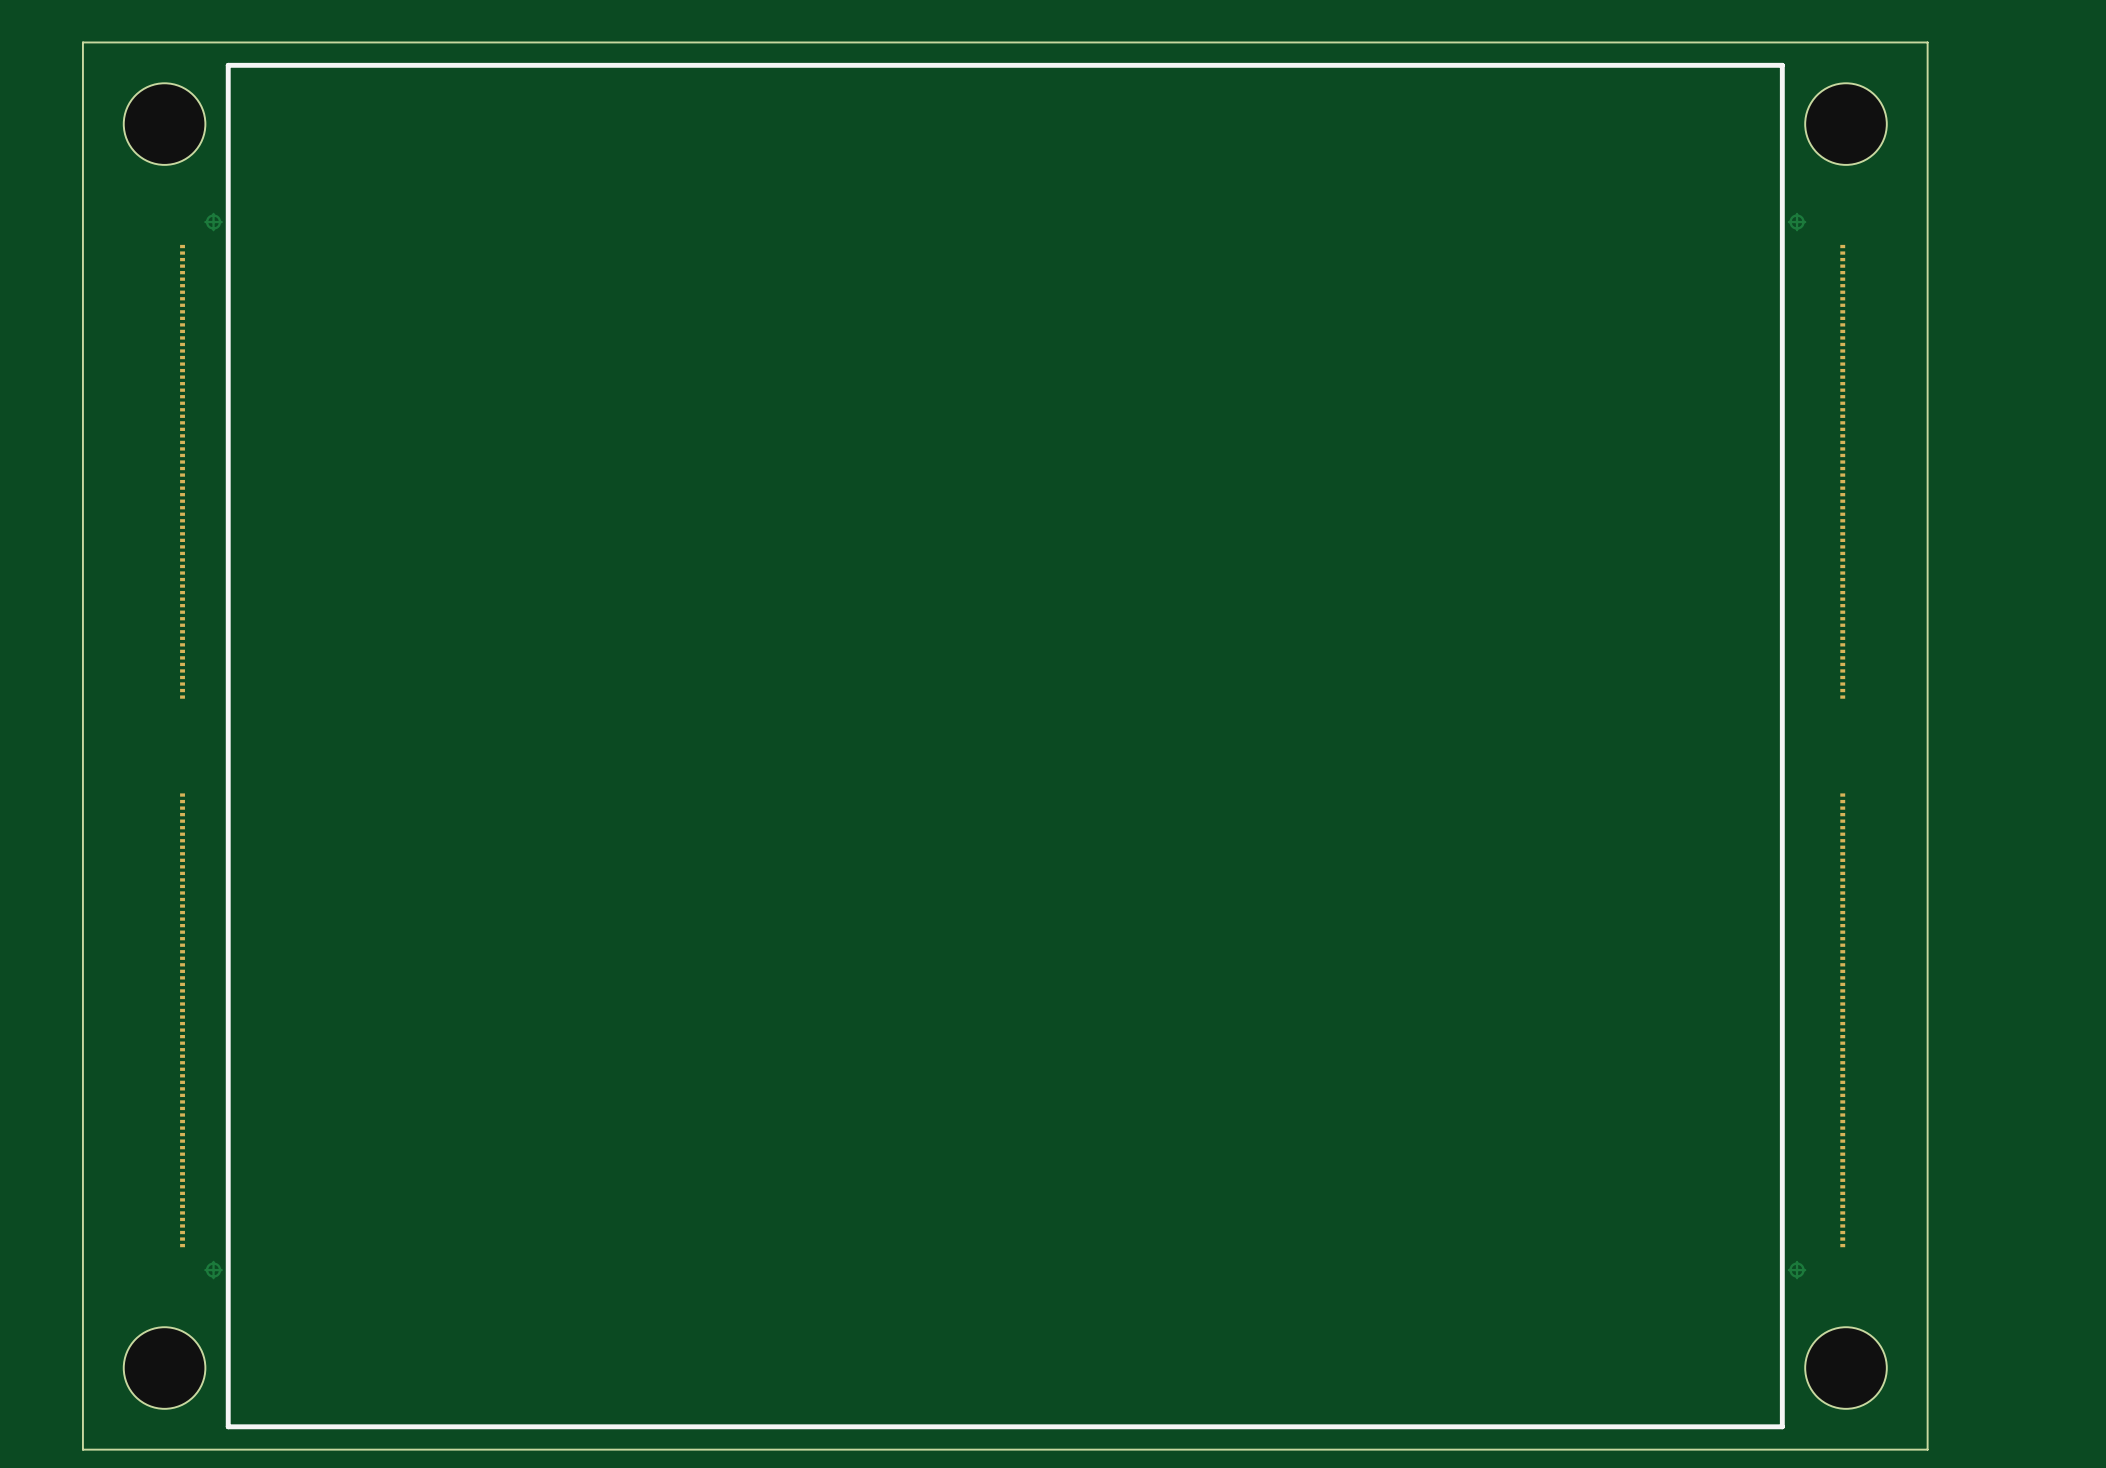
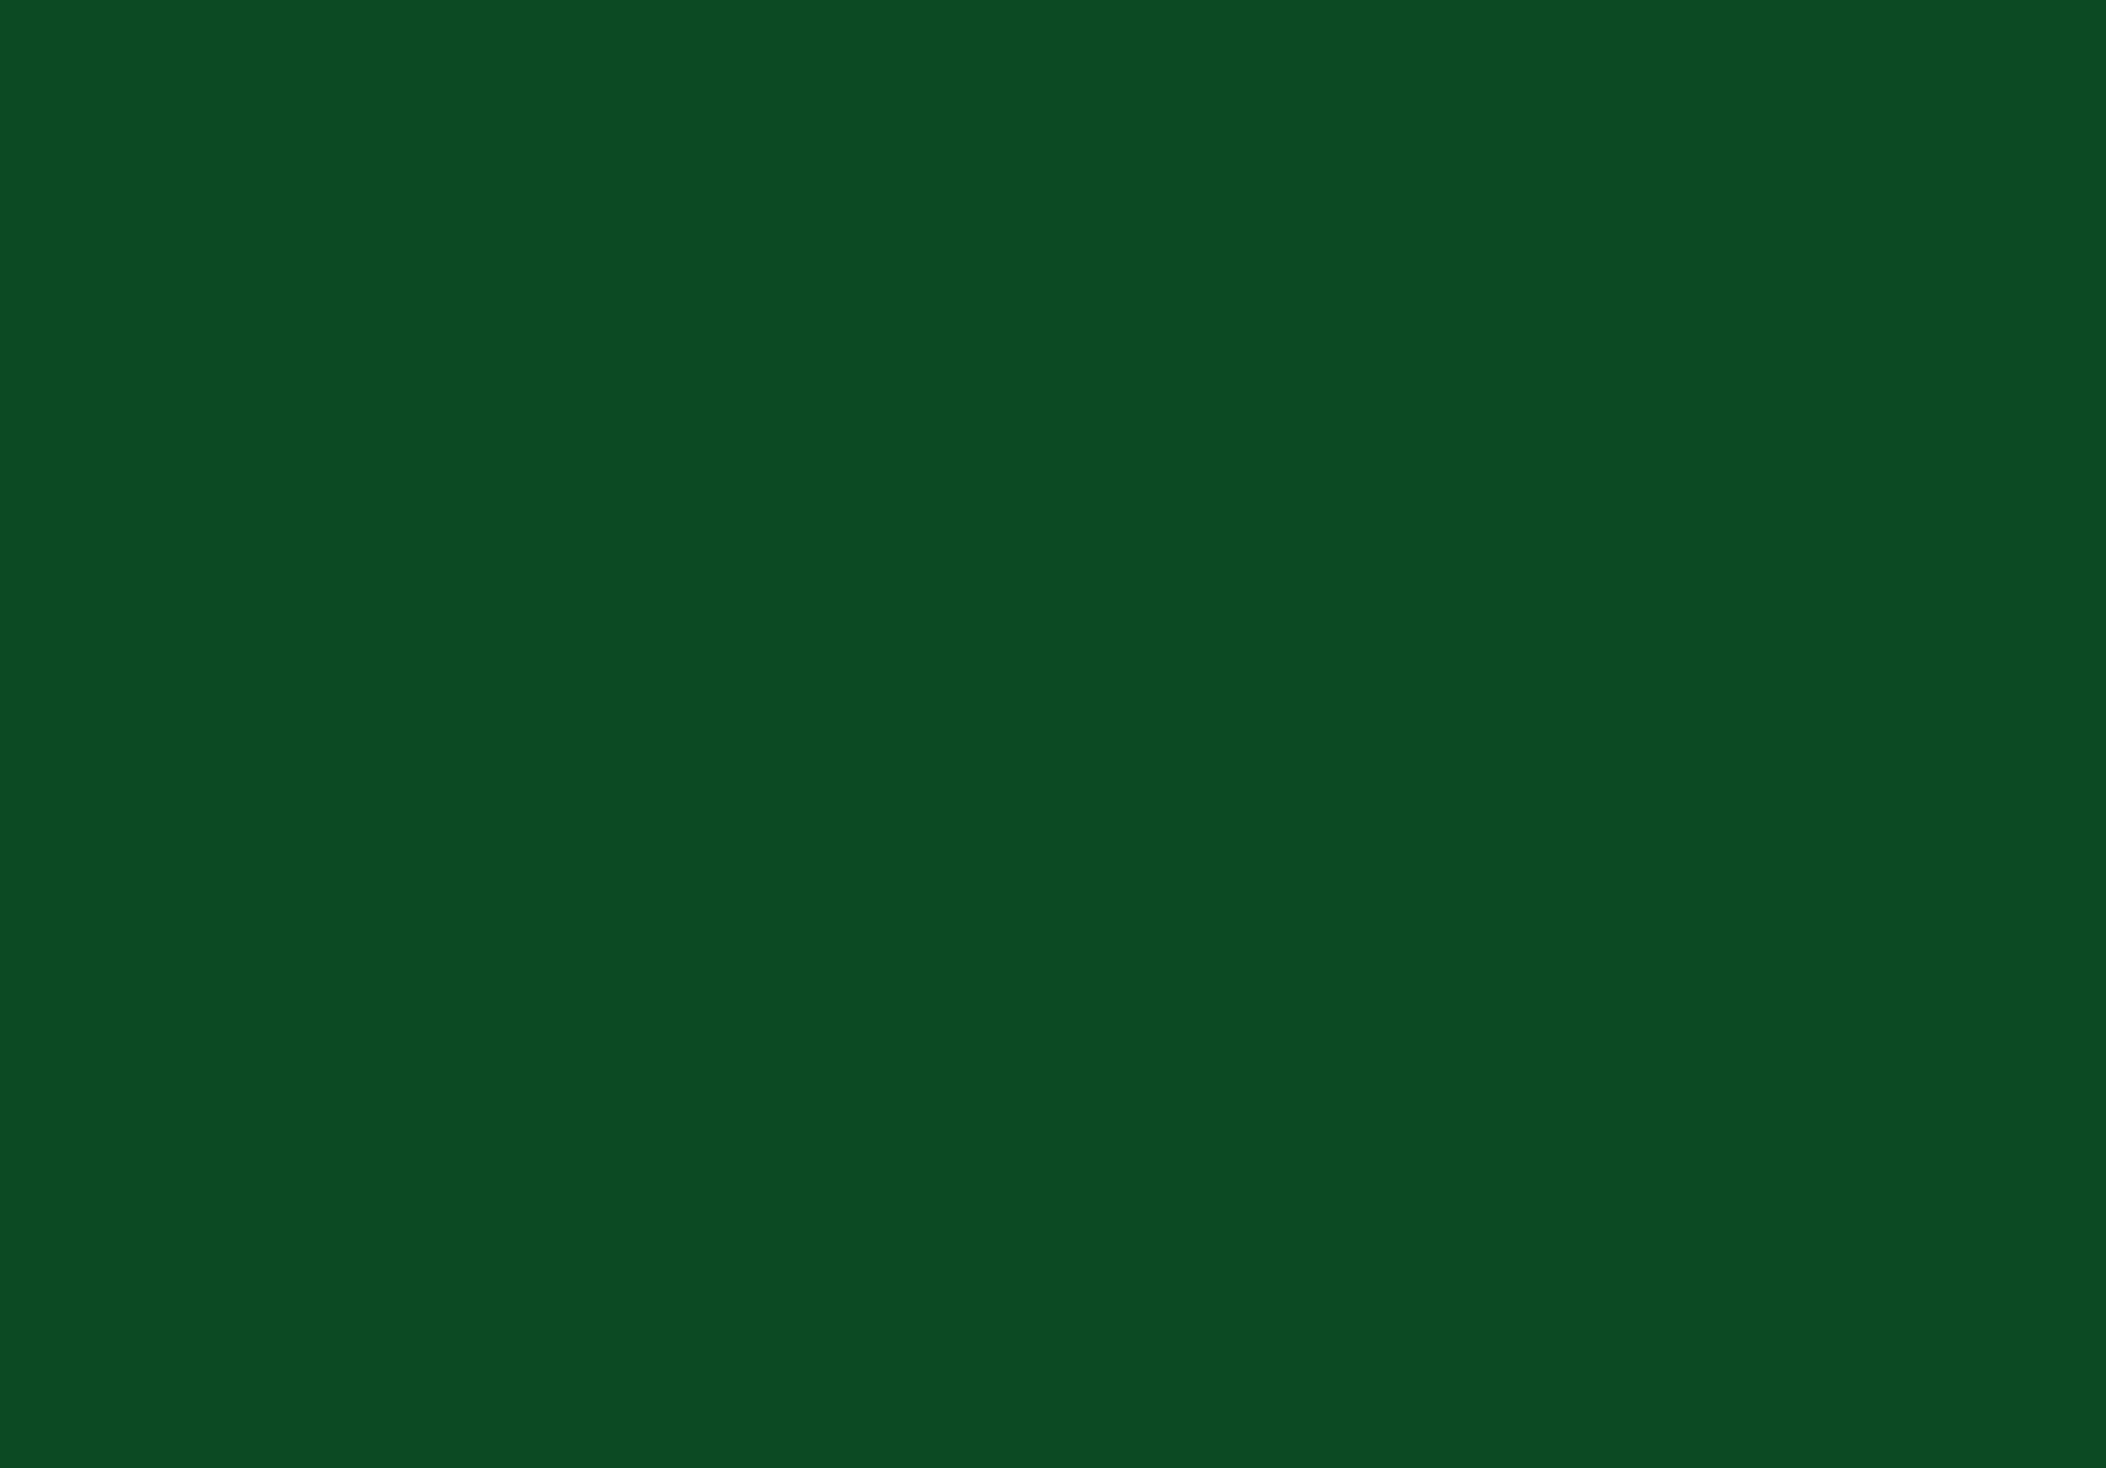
board edge: (82, 42) (1927, 42) (1927, 1449) (82, 1449) (82, 42) -> none
line: (228, 65) (1782, 65) (1782, 1426) (228, 1426) (228, 65) -> none
part: (164, 124) -> none
part: (1846, 124) -> none
drawing: [204, 212, 223, 232] -> none
drawing: [1787, 212, 1807, 232] -> none
part: (182, 471) -> none
part: (1842, 471) -> none
part: (182, 1020) -> none
part: (1842, 1020) -> none
drawing: [204, 1260, 223, 1280] -> none
drawing: [1787, 1260, 1807, 1280] -> none
part: (164, 1368) -> none
part: (1846, 1368) -> none

